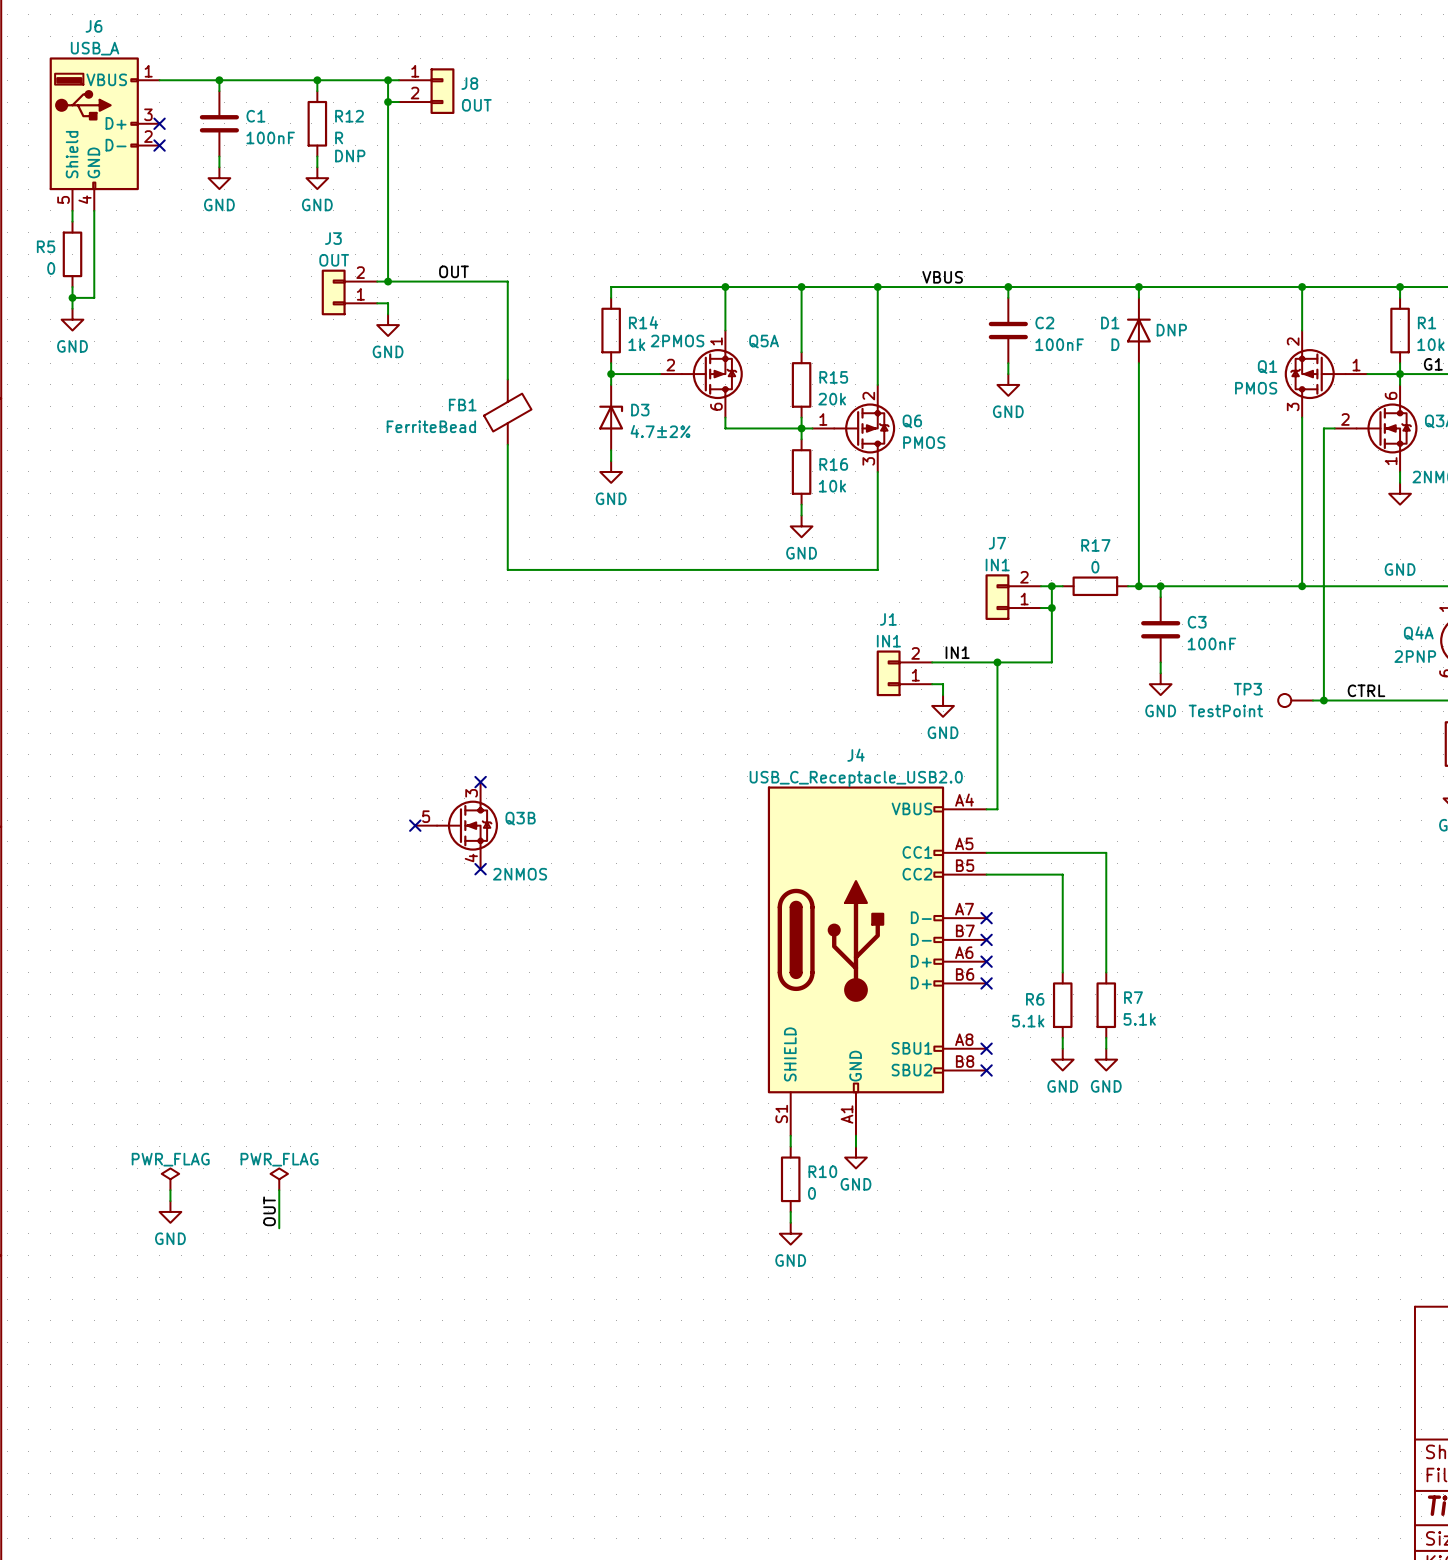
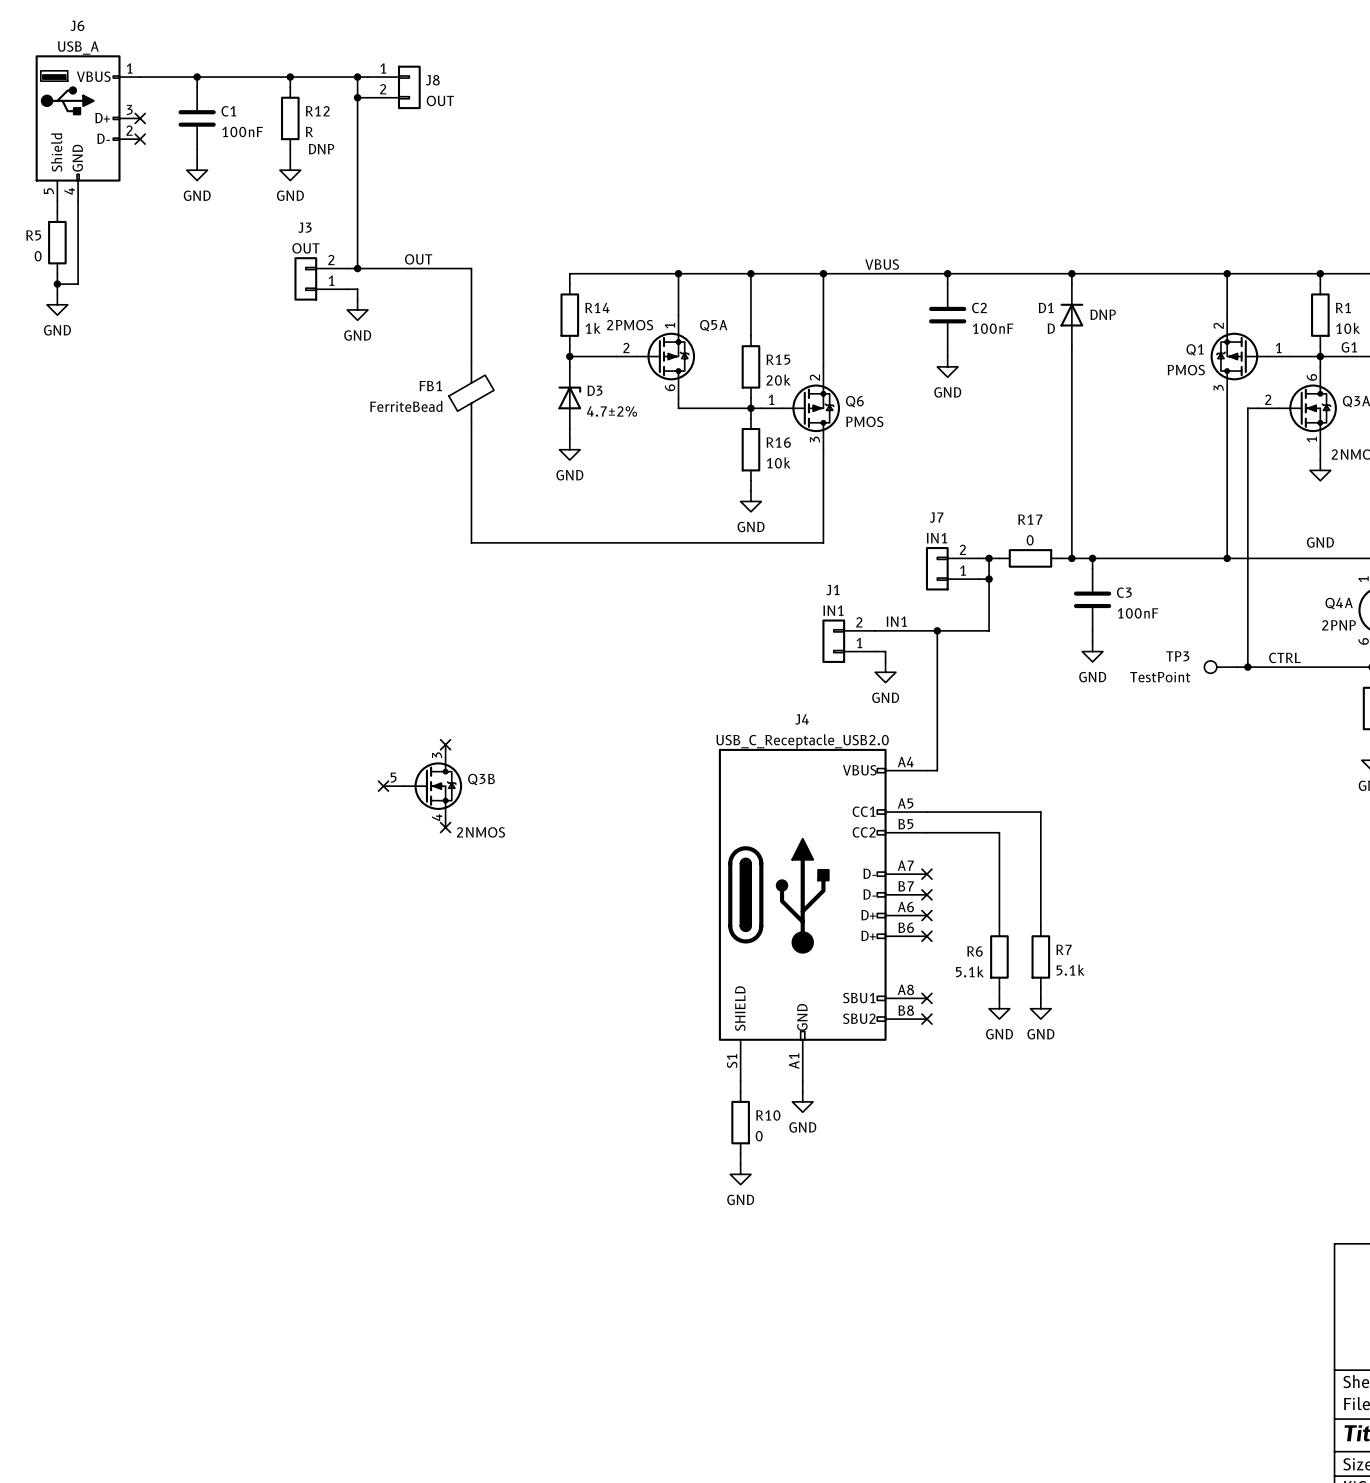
power symbol: PWR_FLAG (170, 1179) -> none
power symbol: PWR_FLAG (279, 1179) -> none
wire: (170, 1190) (170, 1201) -> none
wire: (279, 1190) (279, 1228) -> none
power symbol: GND (170, 1211) -> none
label: OUT (269, 1211) -> none

